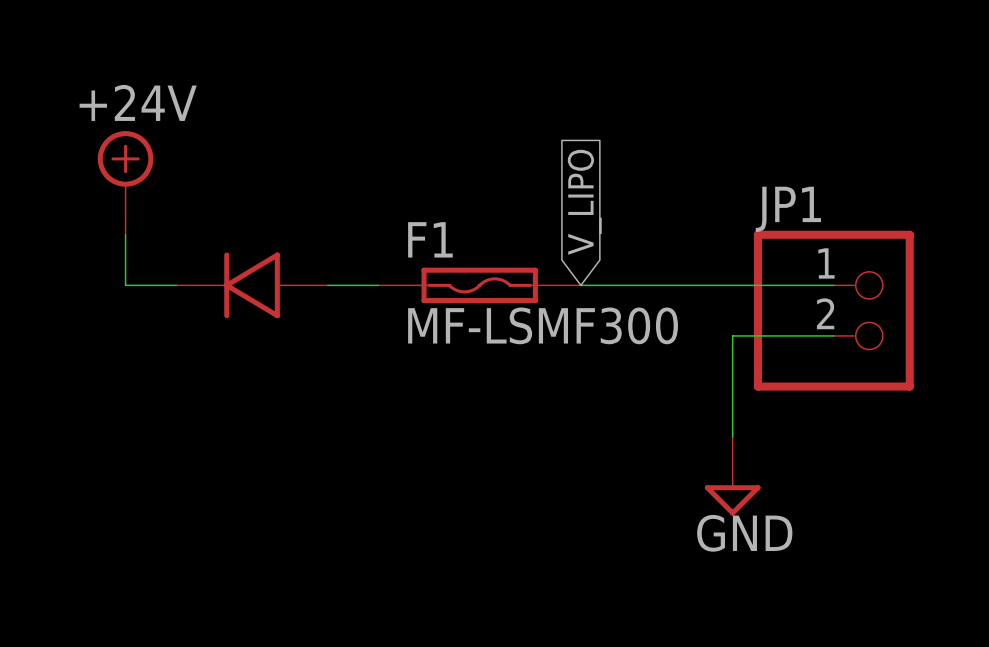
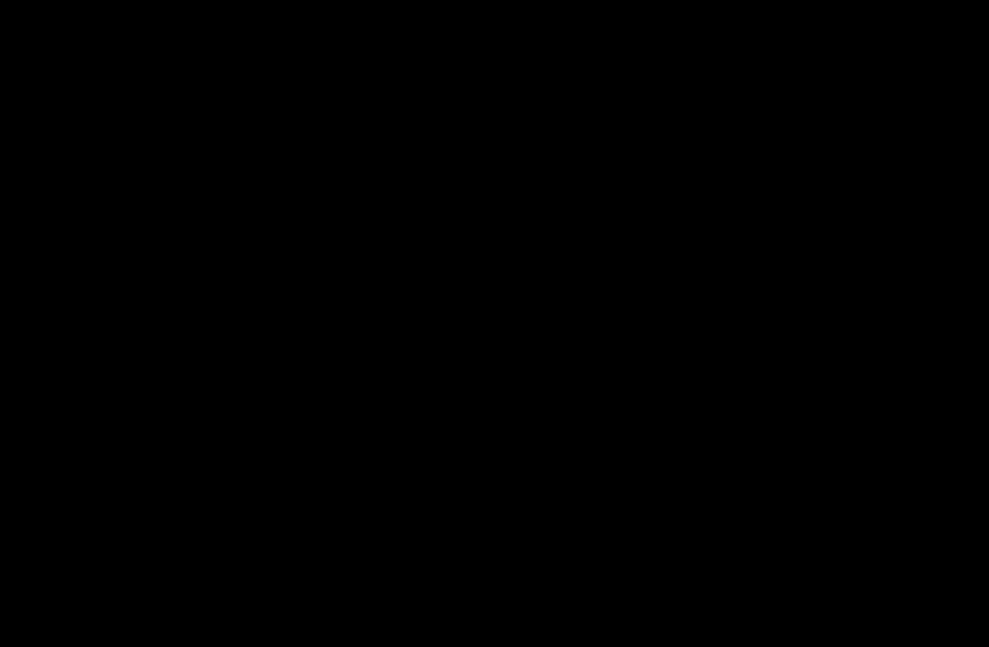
power symbol: +24V (125, 182) -> none
global label: V_LIPO (584, 202) -> none
wire: (125, 234) (125, 285) (176, 285) -> none
part: (252, 285) -> none
wire: (327, 285) (378, 285) -> none
F1: MF-LSMF300 (479, 285) -> none
wire: (580, 285) (833, 285) -> none
JP1: (833, 310) -> none
wire: (833, 335) (732, 335) (732, 437) -> none
power symbol: GND (732, 476) -> none

